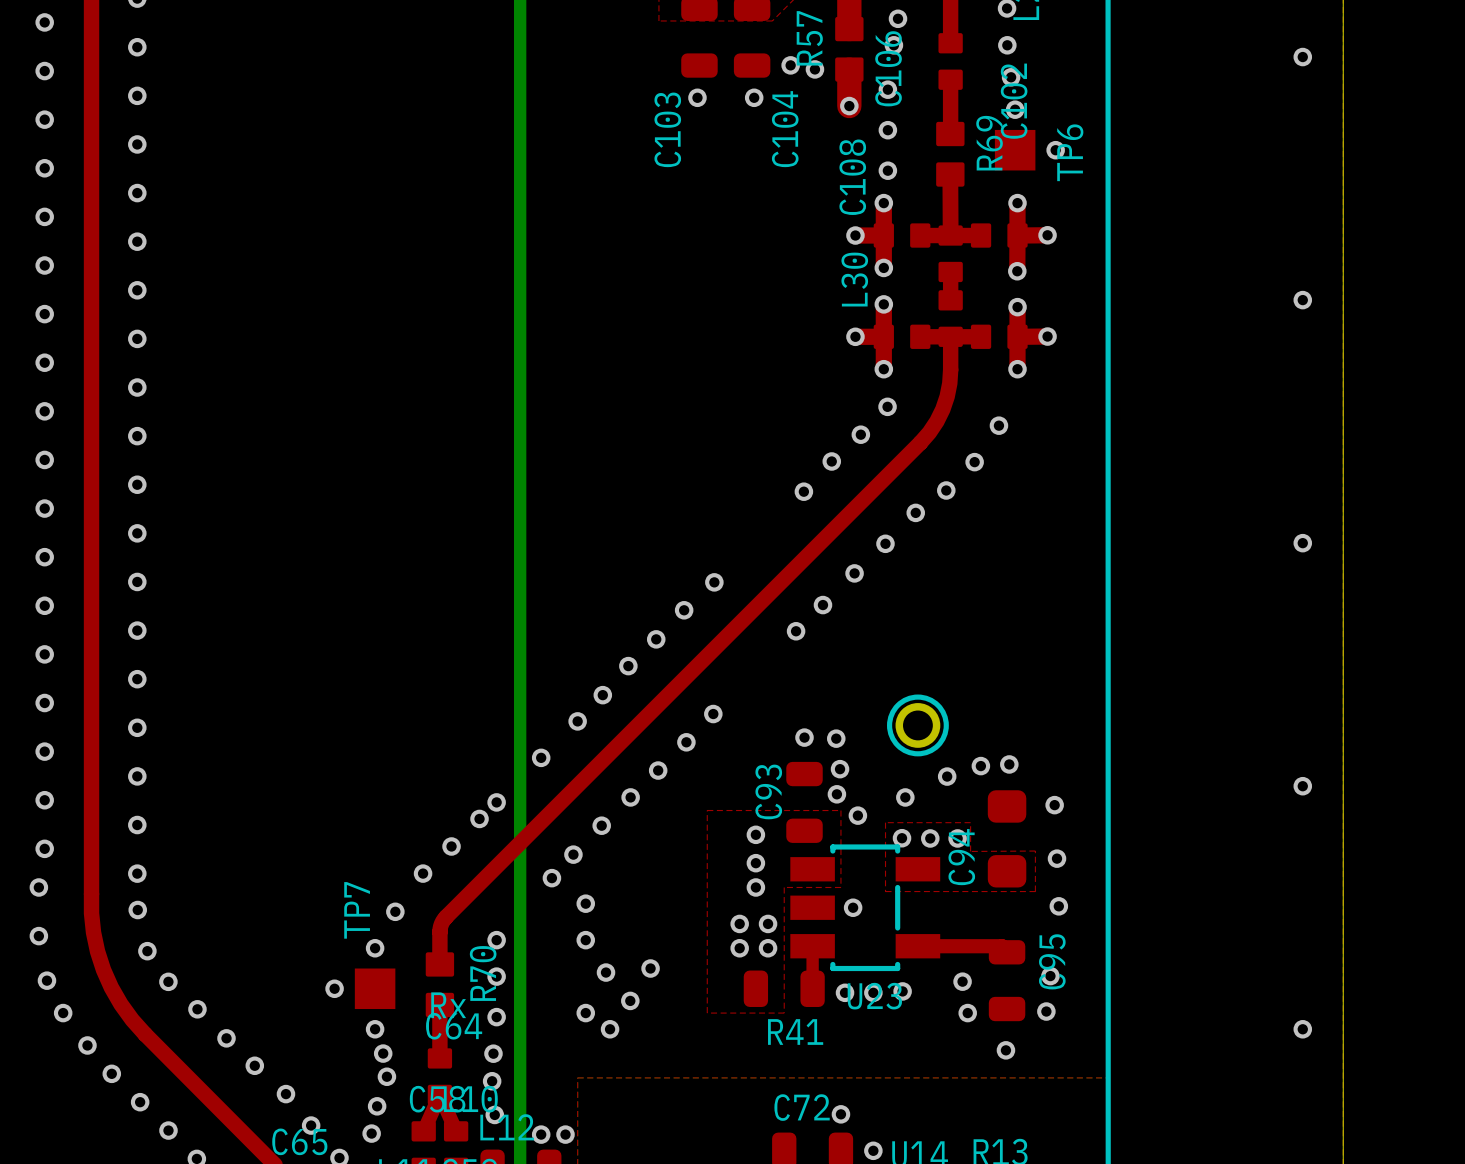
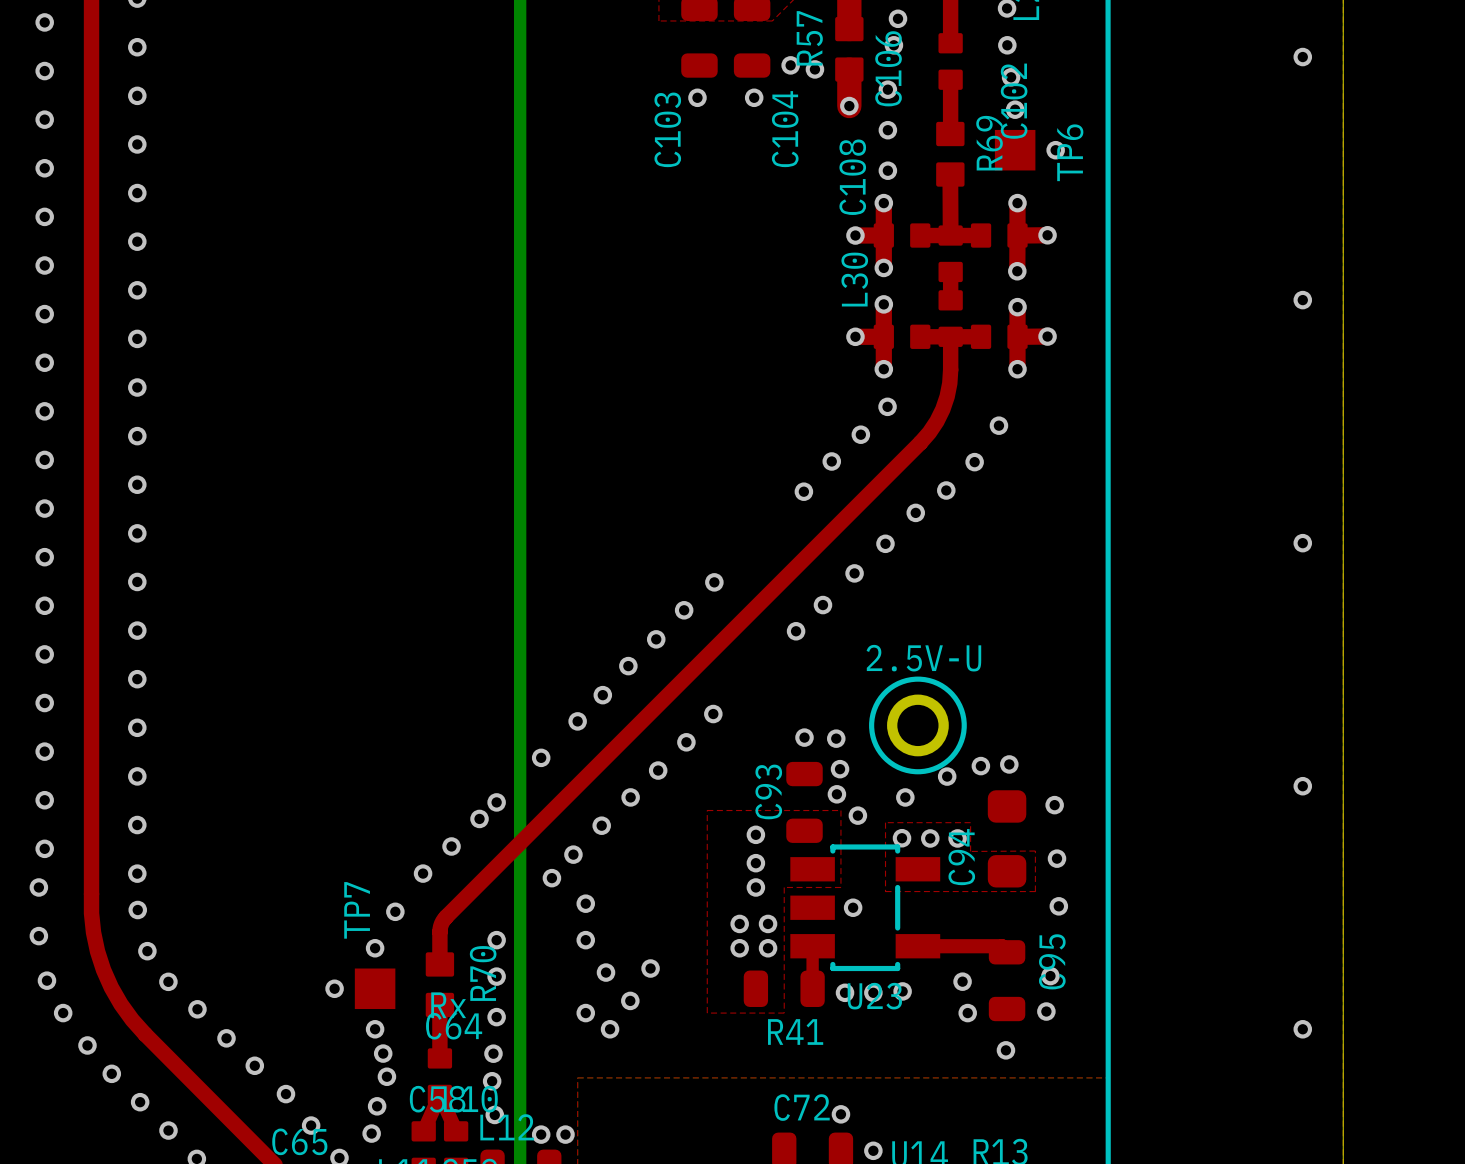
part: (917, 725) -> none
2.5V-U: none -> (917, 725)

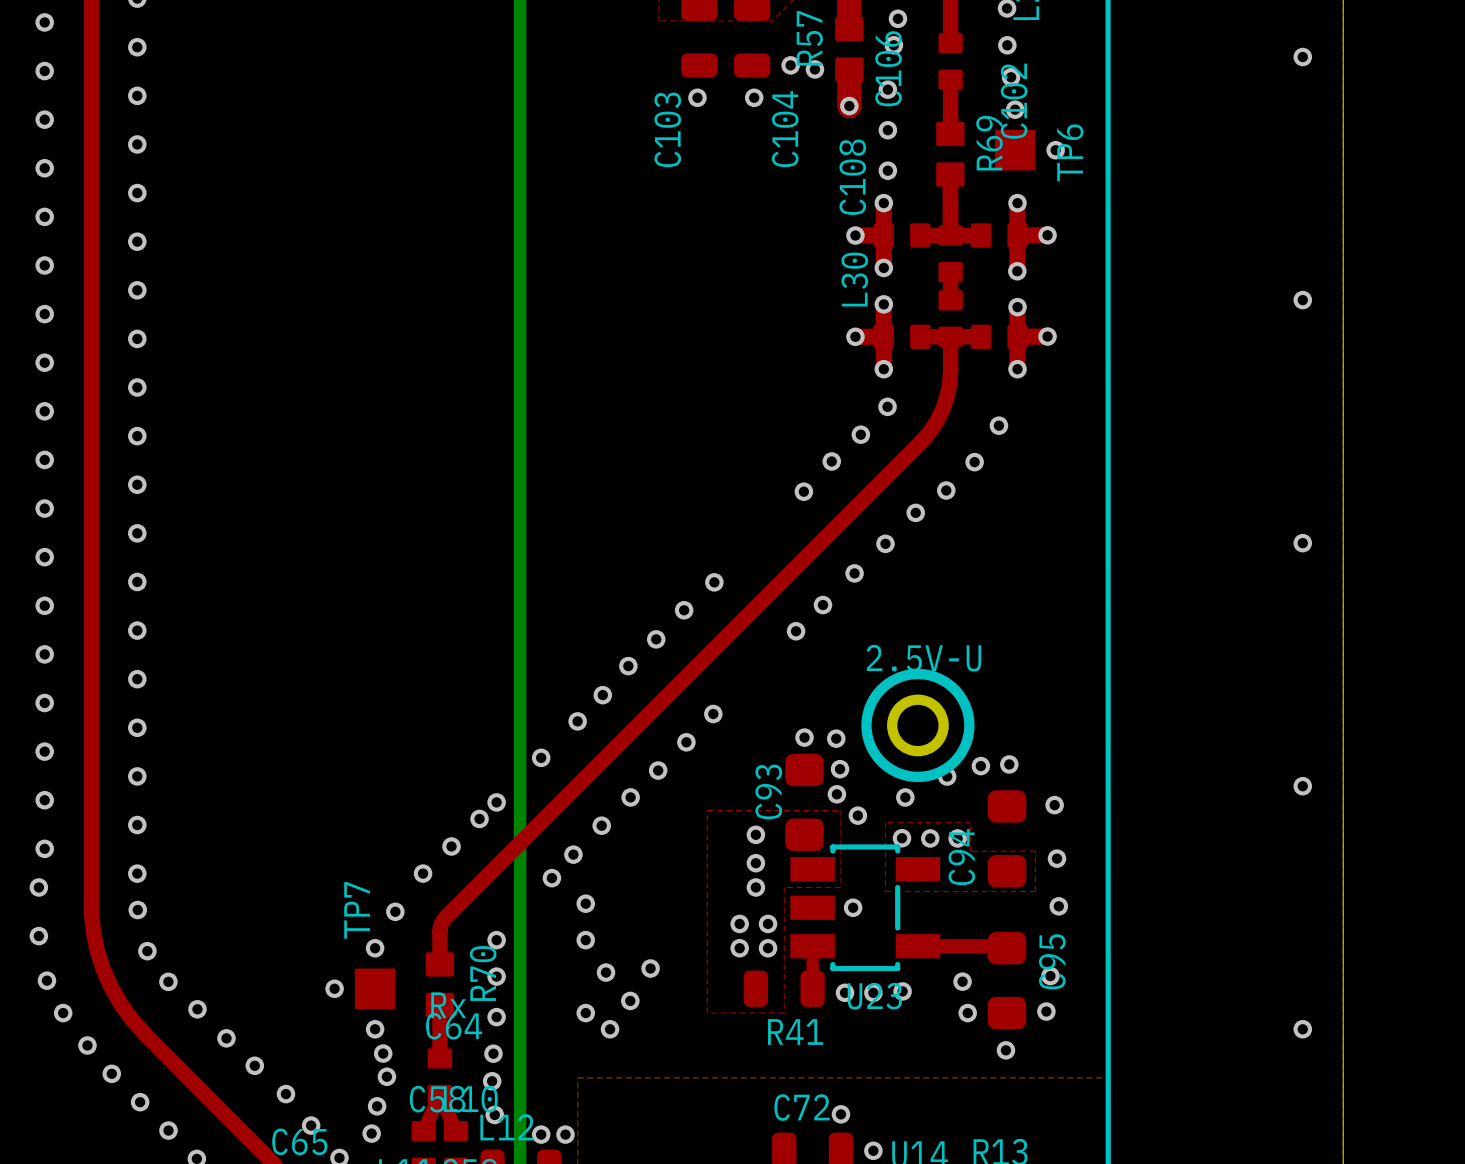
2.5V-U footprint: [869, 676, 967, 775] -> [861, 668, 975, 783]
C93 footprint: [786, 761, 823, 843] -> [785, 753, 824, 852]
C95 footprint: [988, 940, 1026, 1022] -> [987, 932, 1027, 1030]

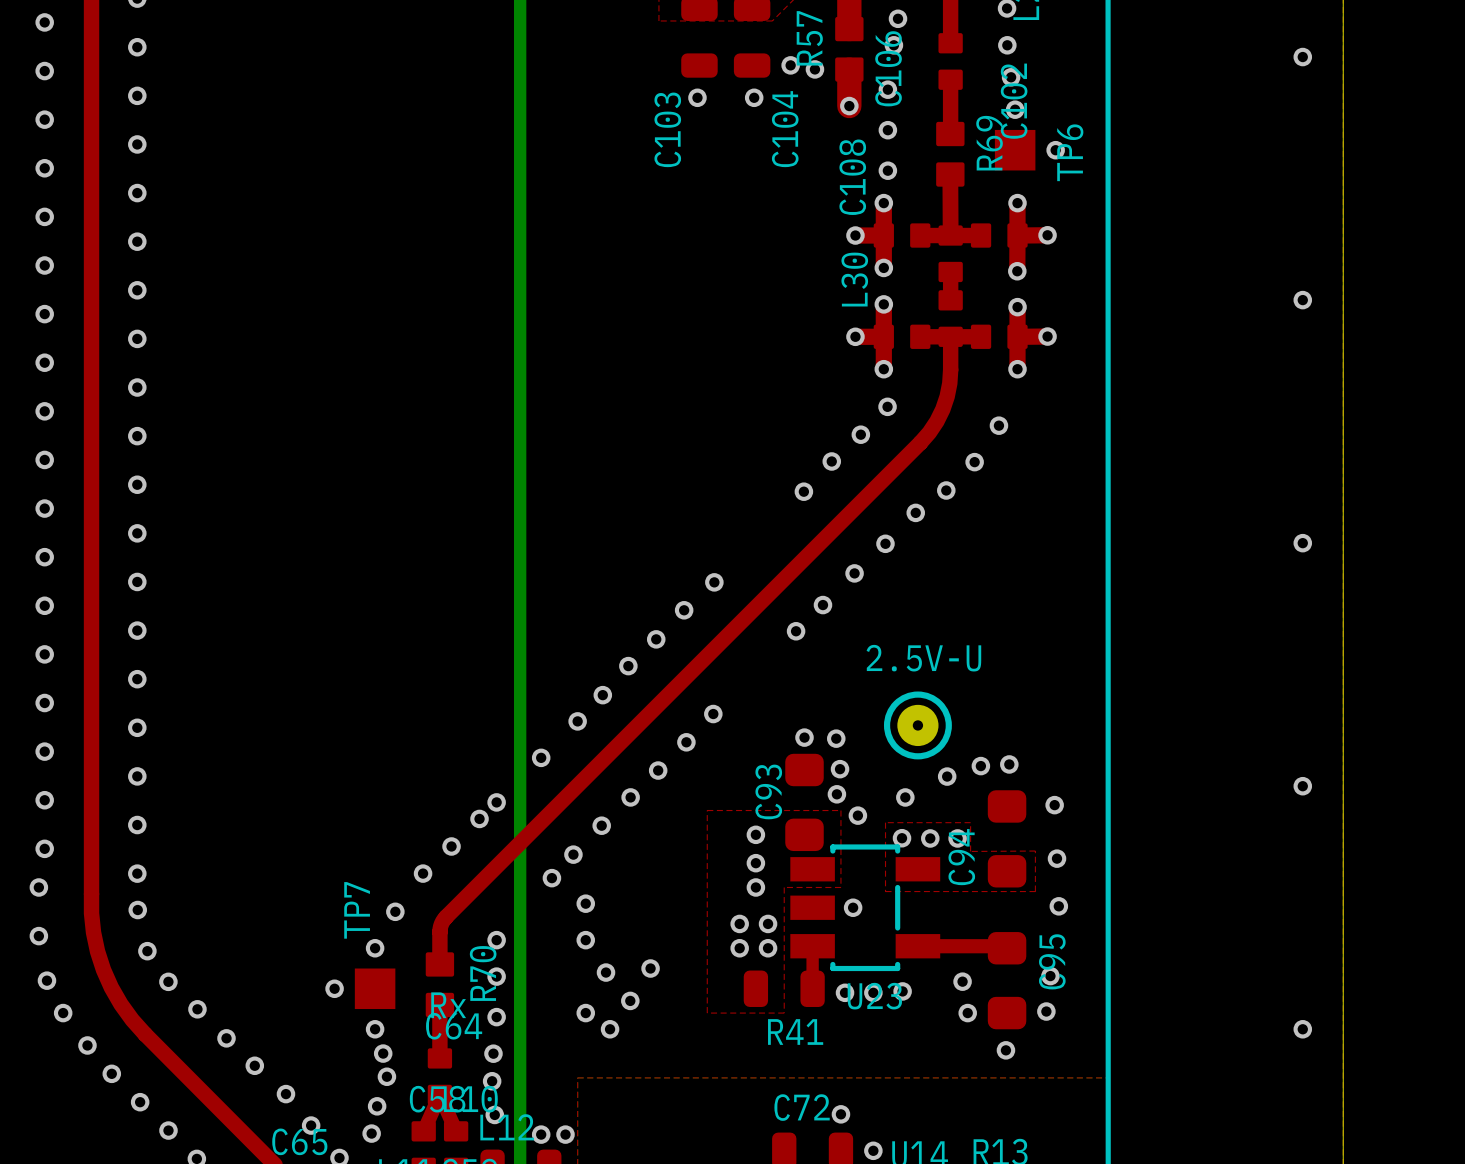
2.5V-U footprint: [861, 668, 975, 783] -> [883, 691, 952, 760]

